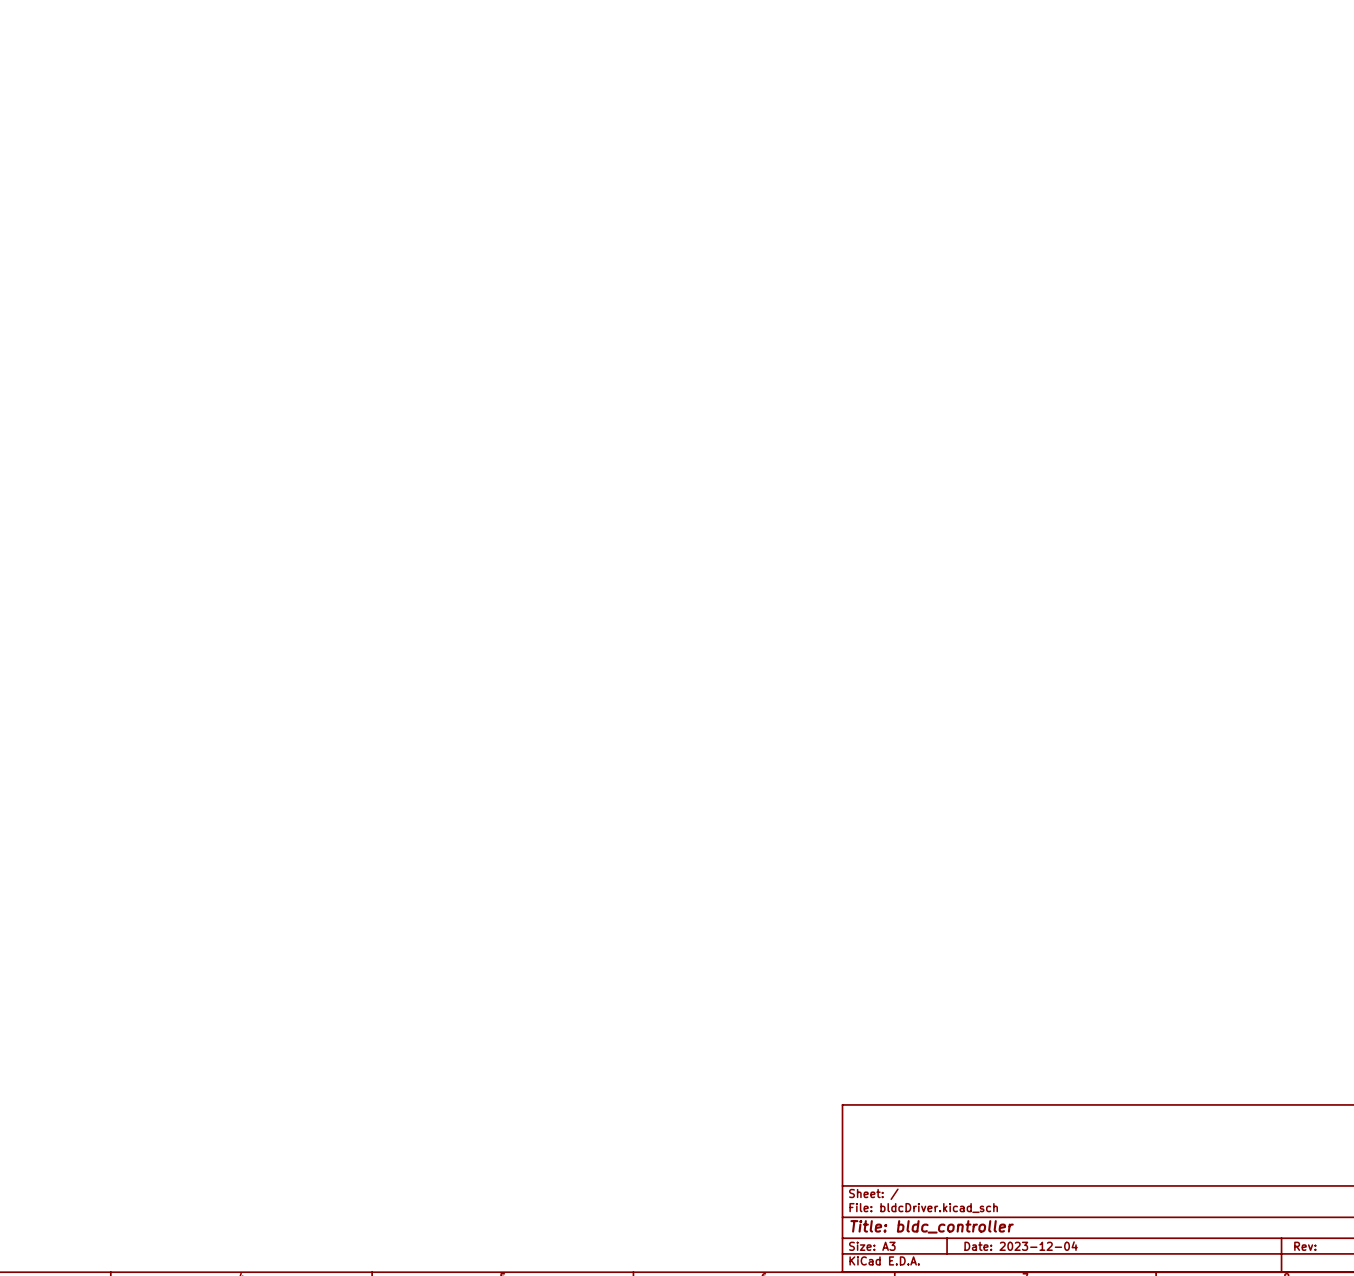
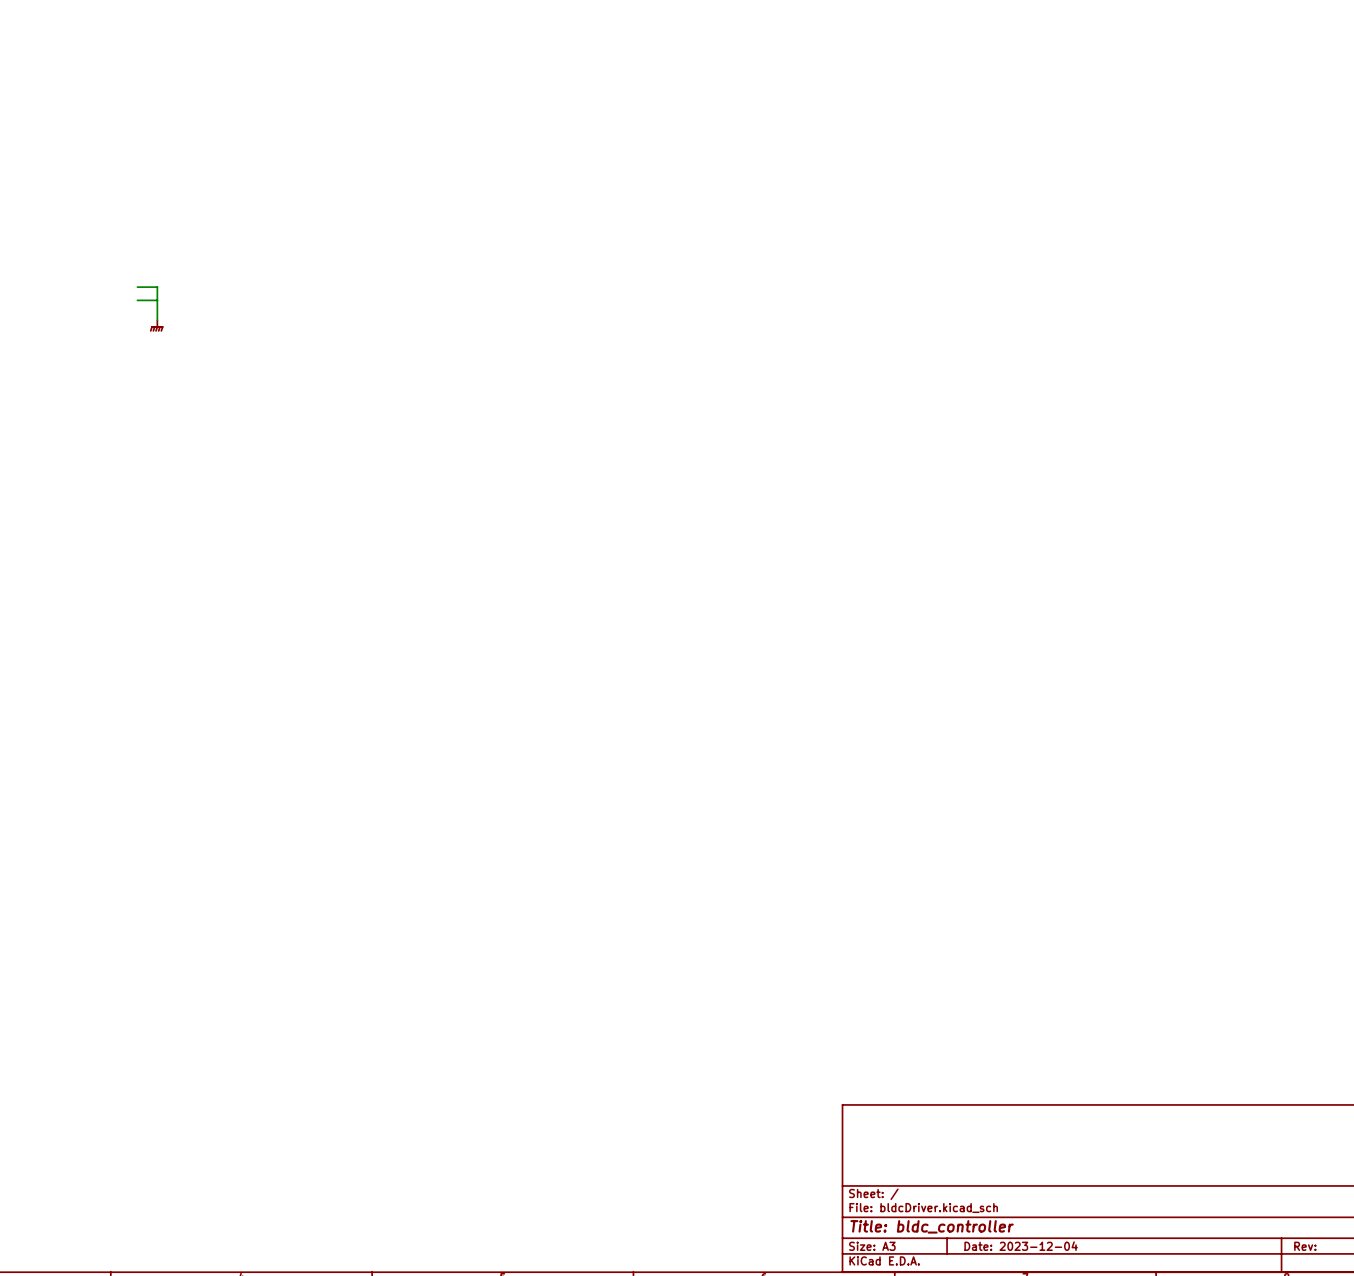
wire: none -> (137, 287) (157, 287) (157, 320)
wire: none -> (137, 300) (157, 300)
power symbol: none -> (156, 325)

